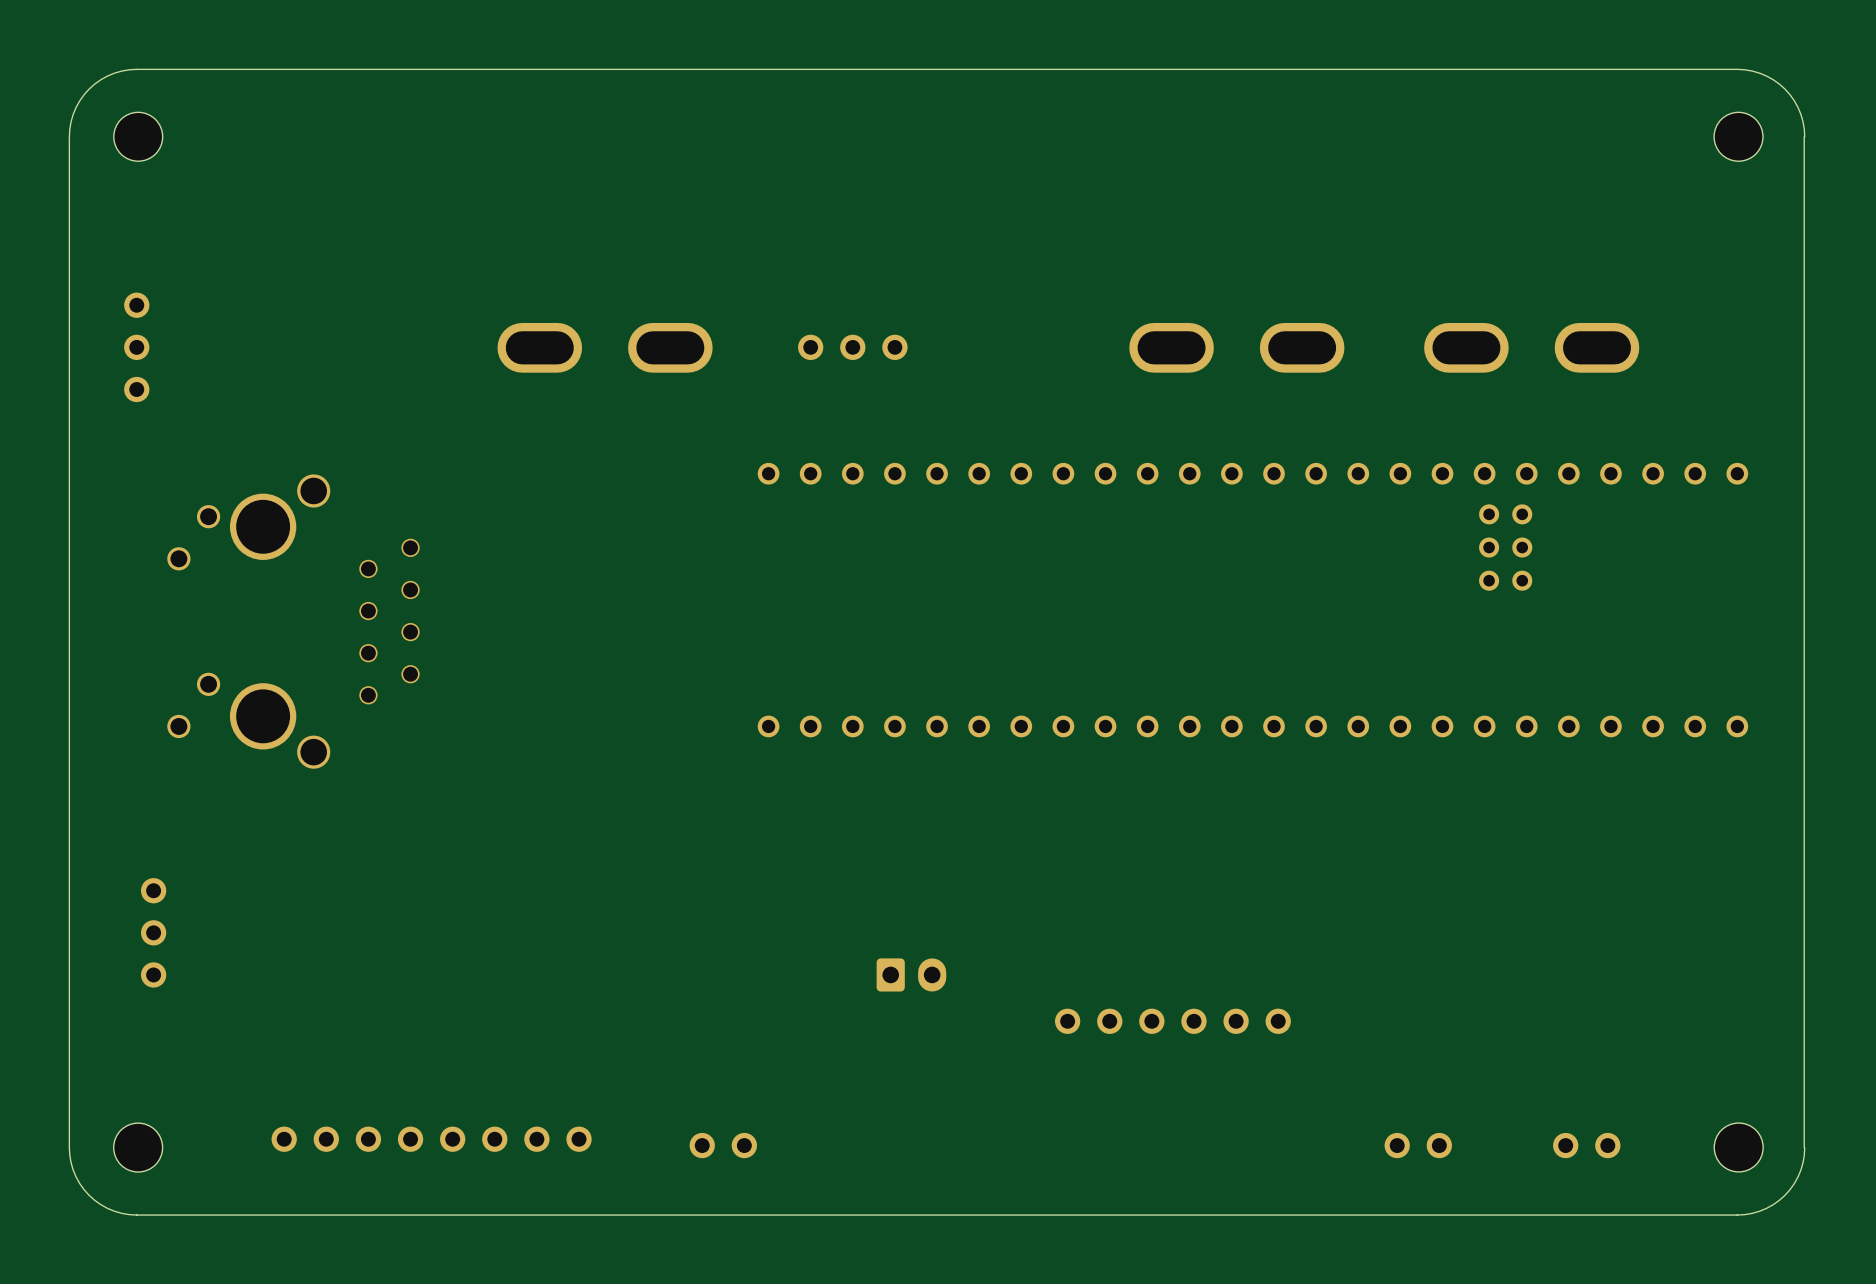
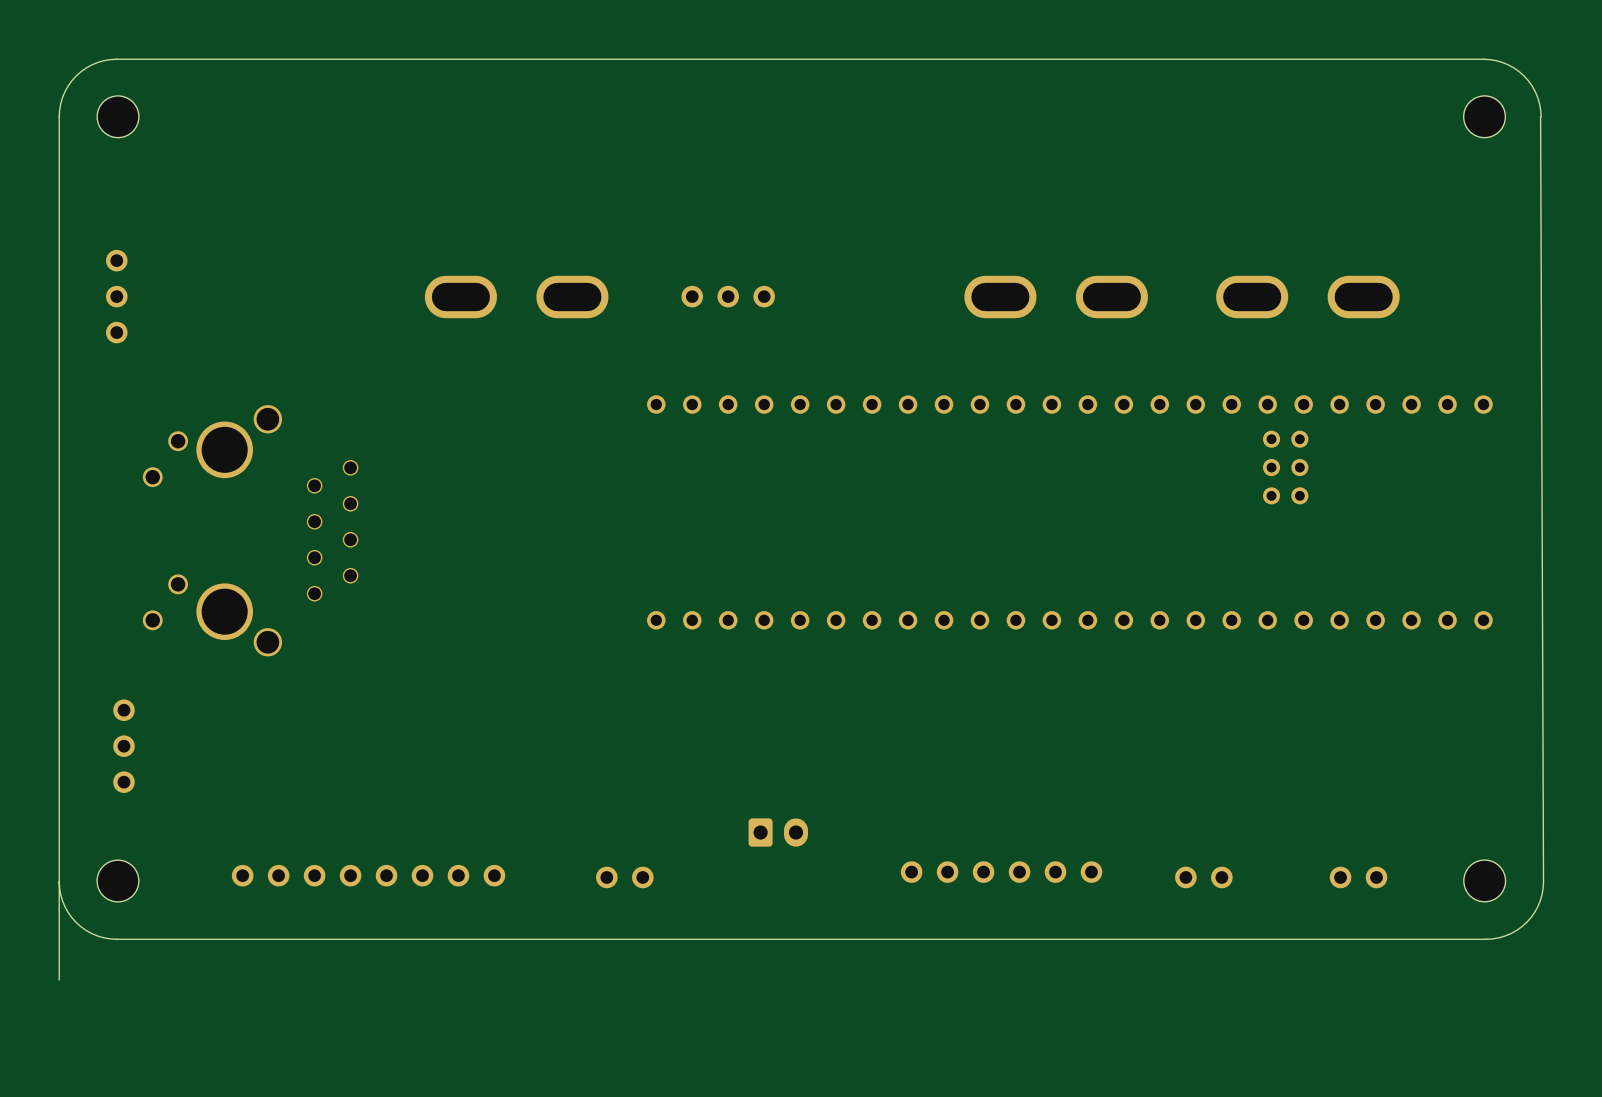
board edge: (1804, 136) (1804, 1147) -> (1540, 116) (1543, 881) (1542, 894) (1534, 912) (1526, 922) (1510, 933) (1485, 939) (116, 939) (97, 936) (76, 922) (64, 906) (59, 881)
part position: (153, 932) -> (123, 746)
part: none -> (1203, 877)
part: none -> (1358, 877)
part position: (431, 1139) -> (368, 875)
part position: (723, 1145) -> (624, 877)
part: (1418, 1145) -> none
part: (1586, 1145) -> none
part position: (138, 1147) -> (117, 881)
part position: (1738, 1147) -> (1484, 880)
board edge: (1804, 1147) (1800, 1169) (1794, 1183) (1784, 1195) (1773, 1204) (1759, 1211) (1737, 1215) (136, 1215) (114, 1211) (100, 1204) (89, 1195) (76, 1176) (71, 1162) (69, 1147) -> none

